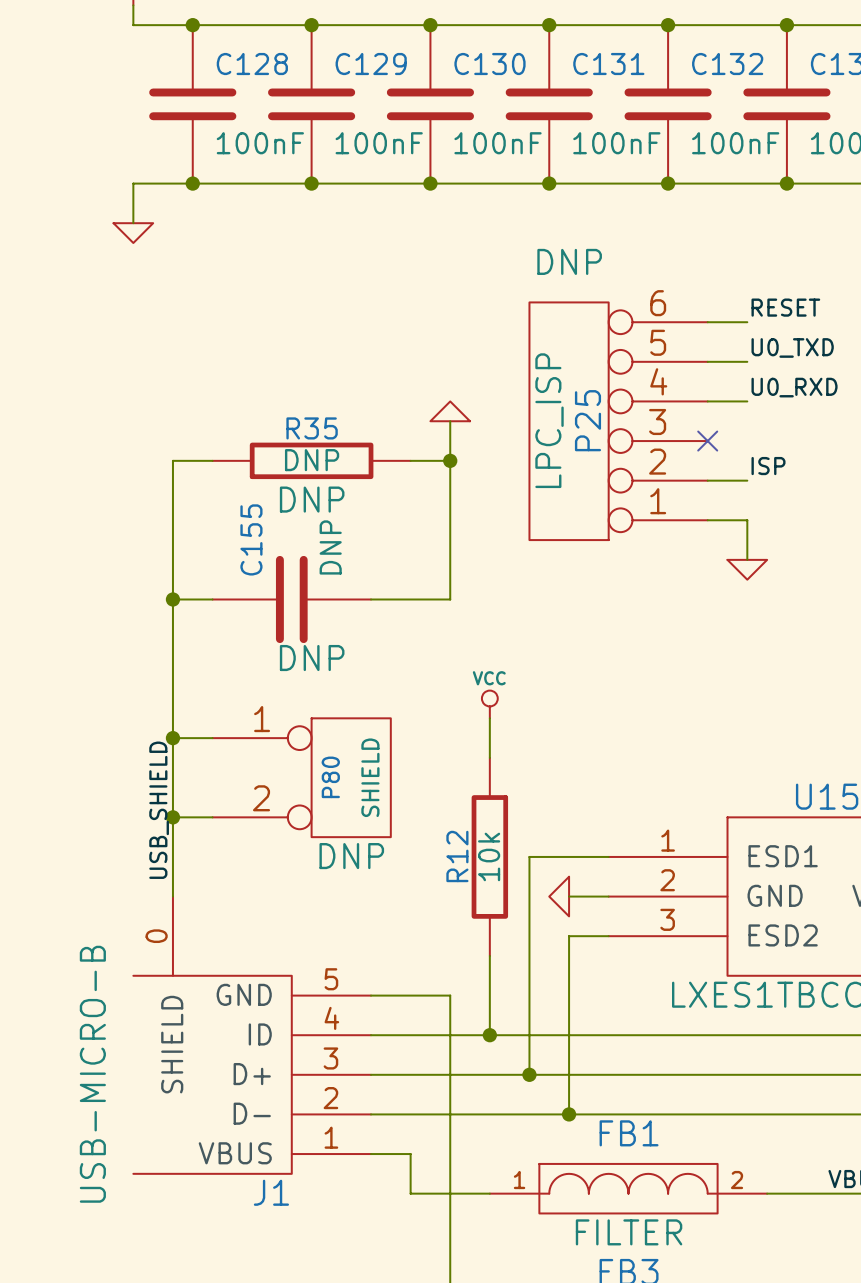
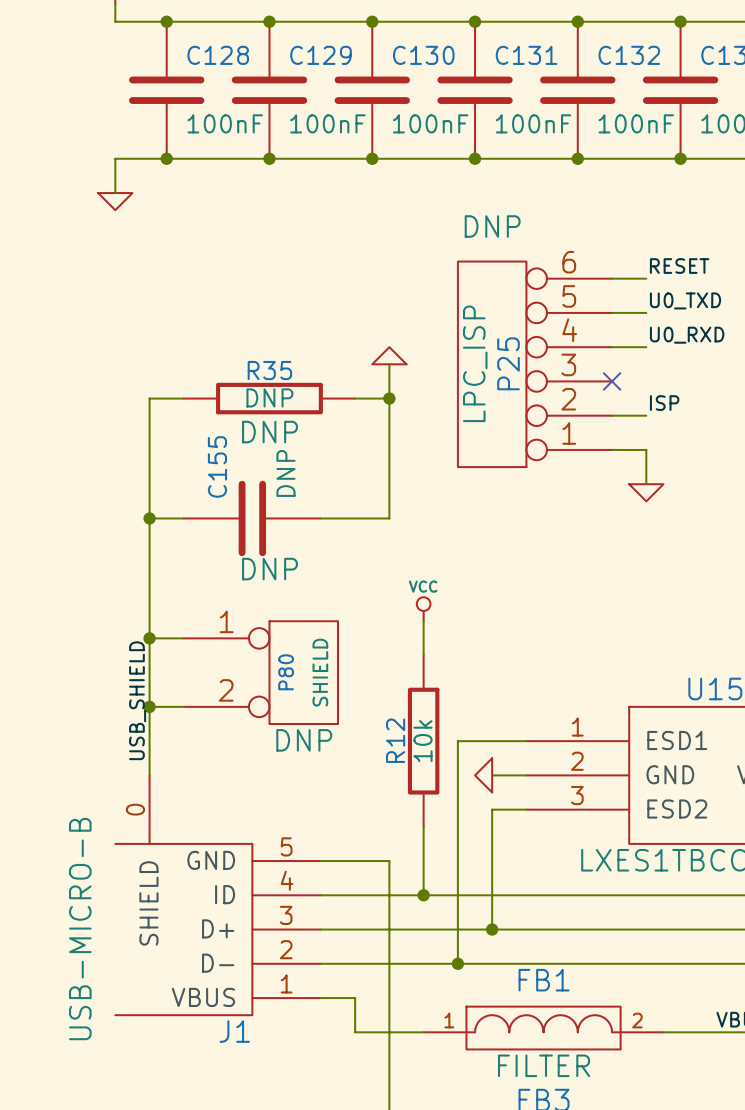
junction: (529, 1074) -> none
wire: (569, 1074) (569, 1114) -> (457, 929) (457, 963)
junction: none -> (492, 929)
junction: none -> (457, 963)
junction: (569, 1114) -> none

